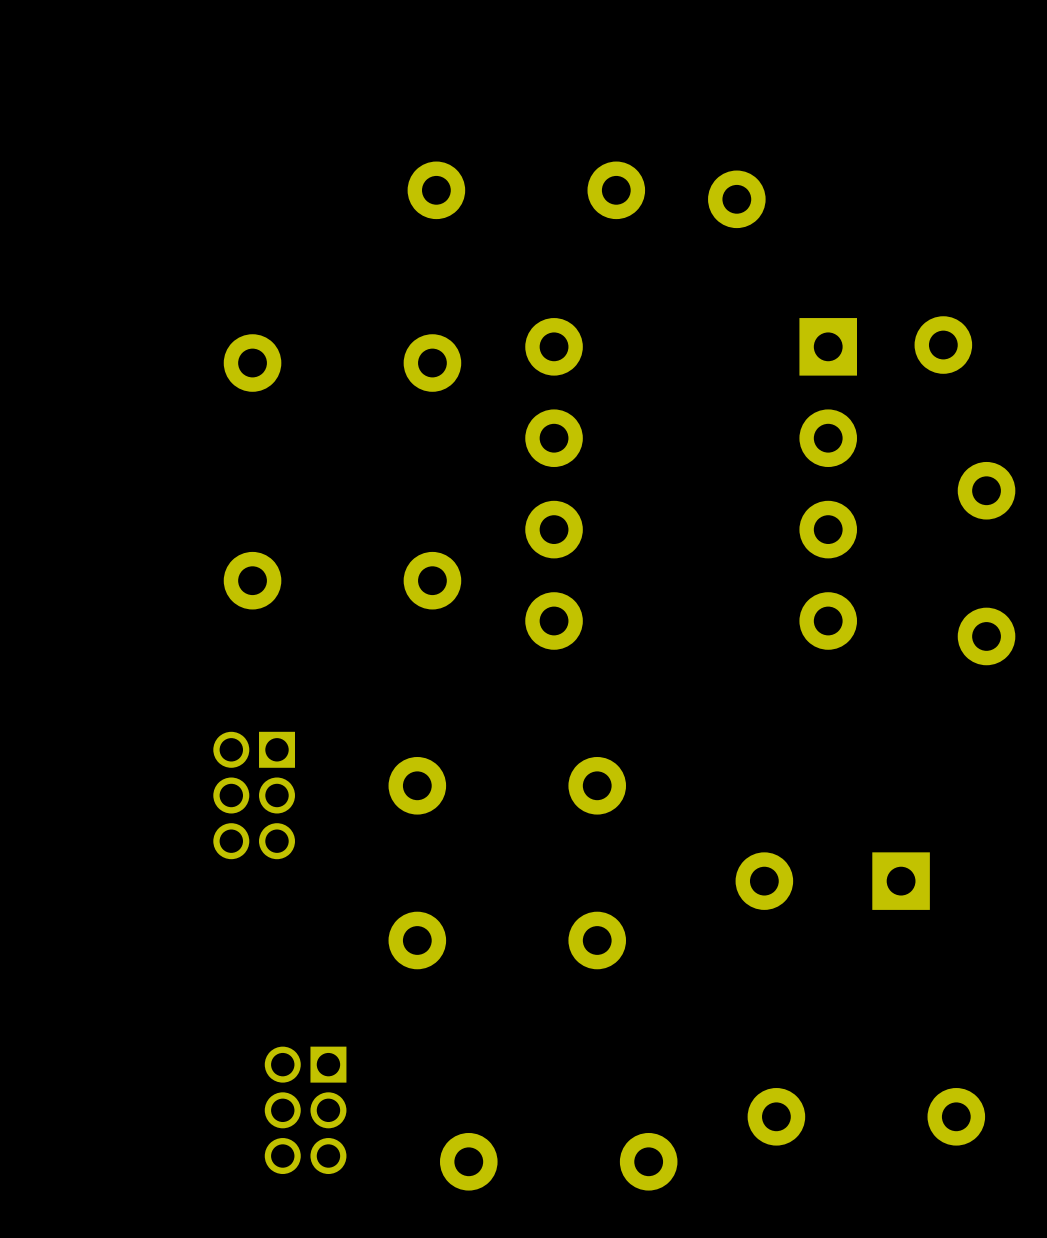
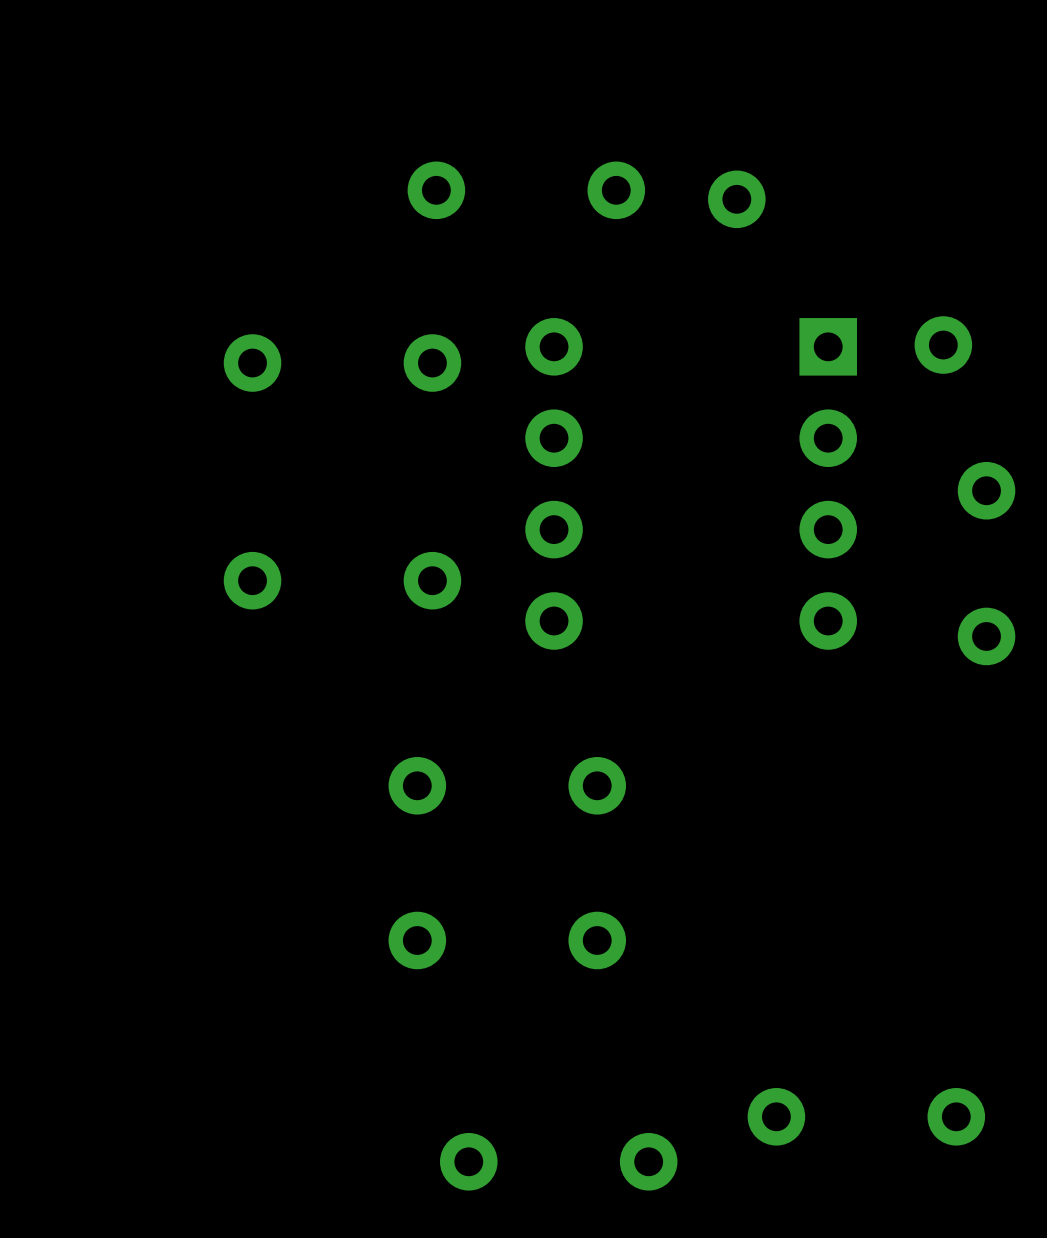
part: (254, 795) -> none
part: (832, 881) -> none
part: (305, 1110) -> none

